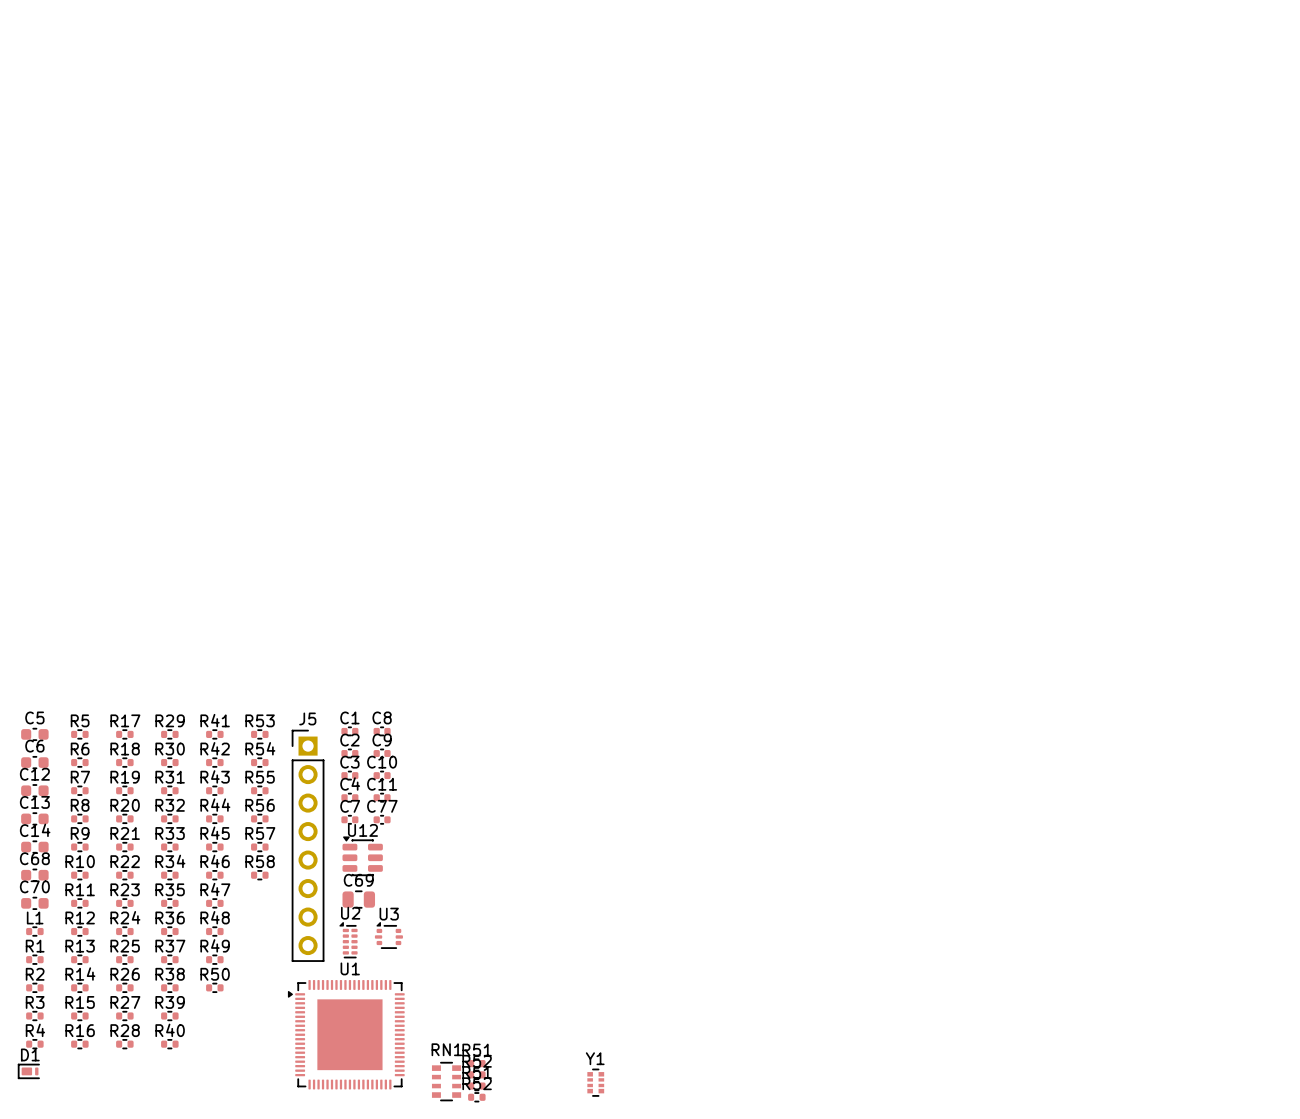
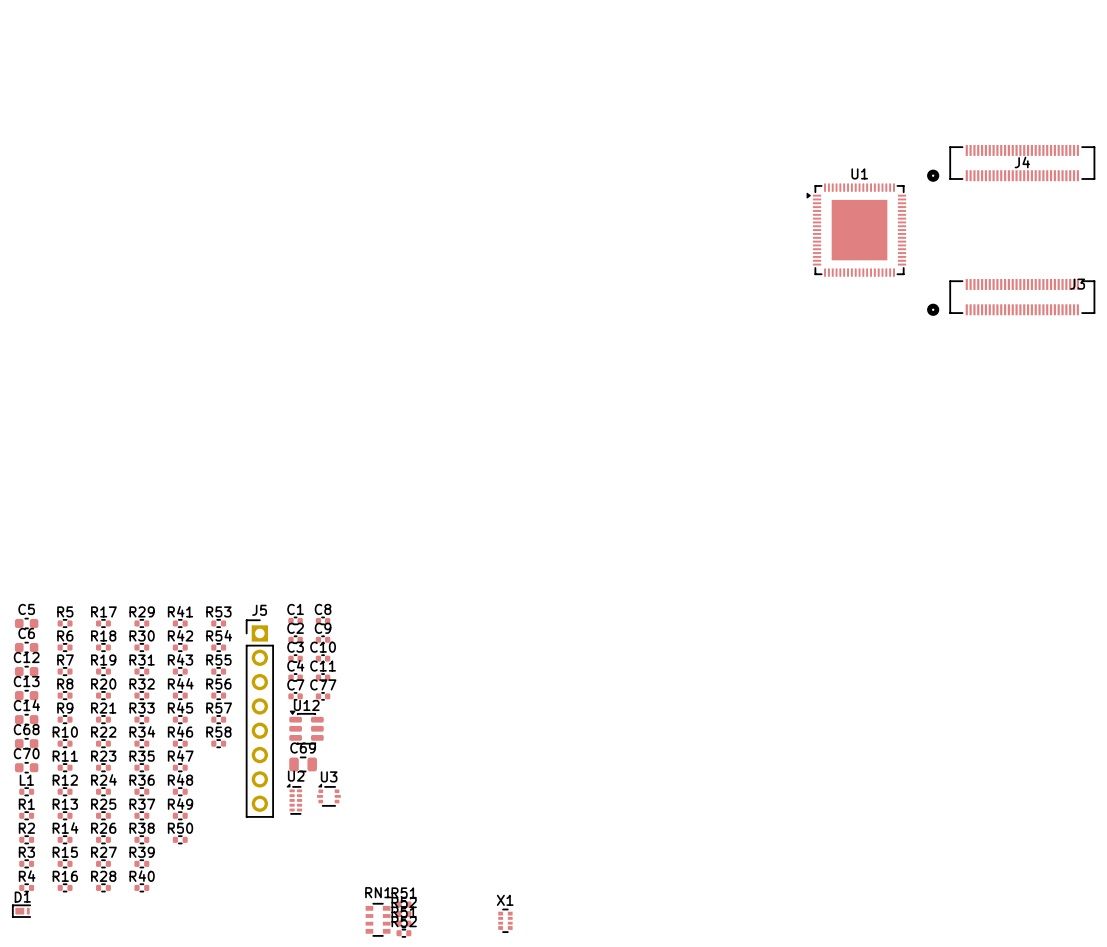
J4: none -> (1011, 163)
J3: none -> (1011, 297)
U1 position: (346, 1034) -> (856, 230)
Y1 name: Y1 (595, 1058) -> X1 (505, 900)

